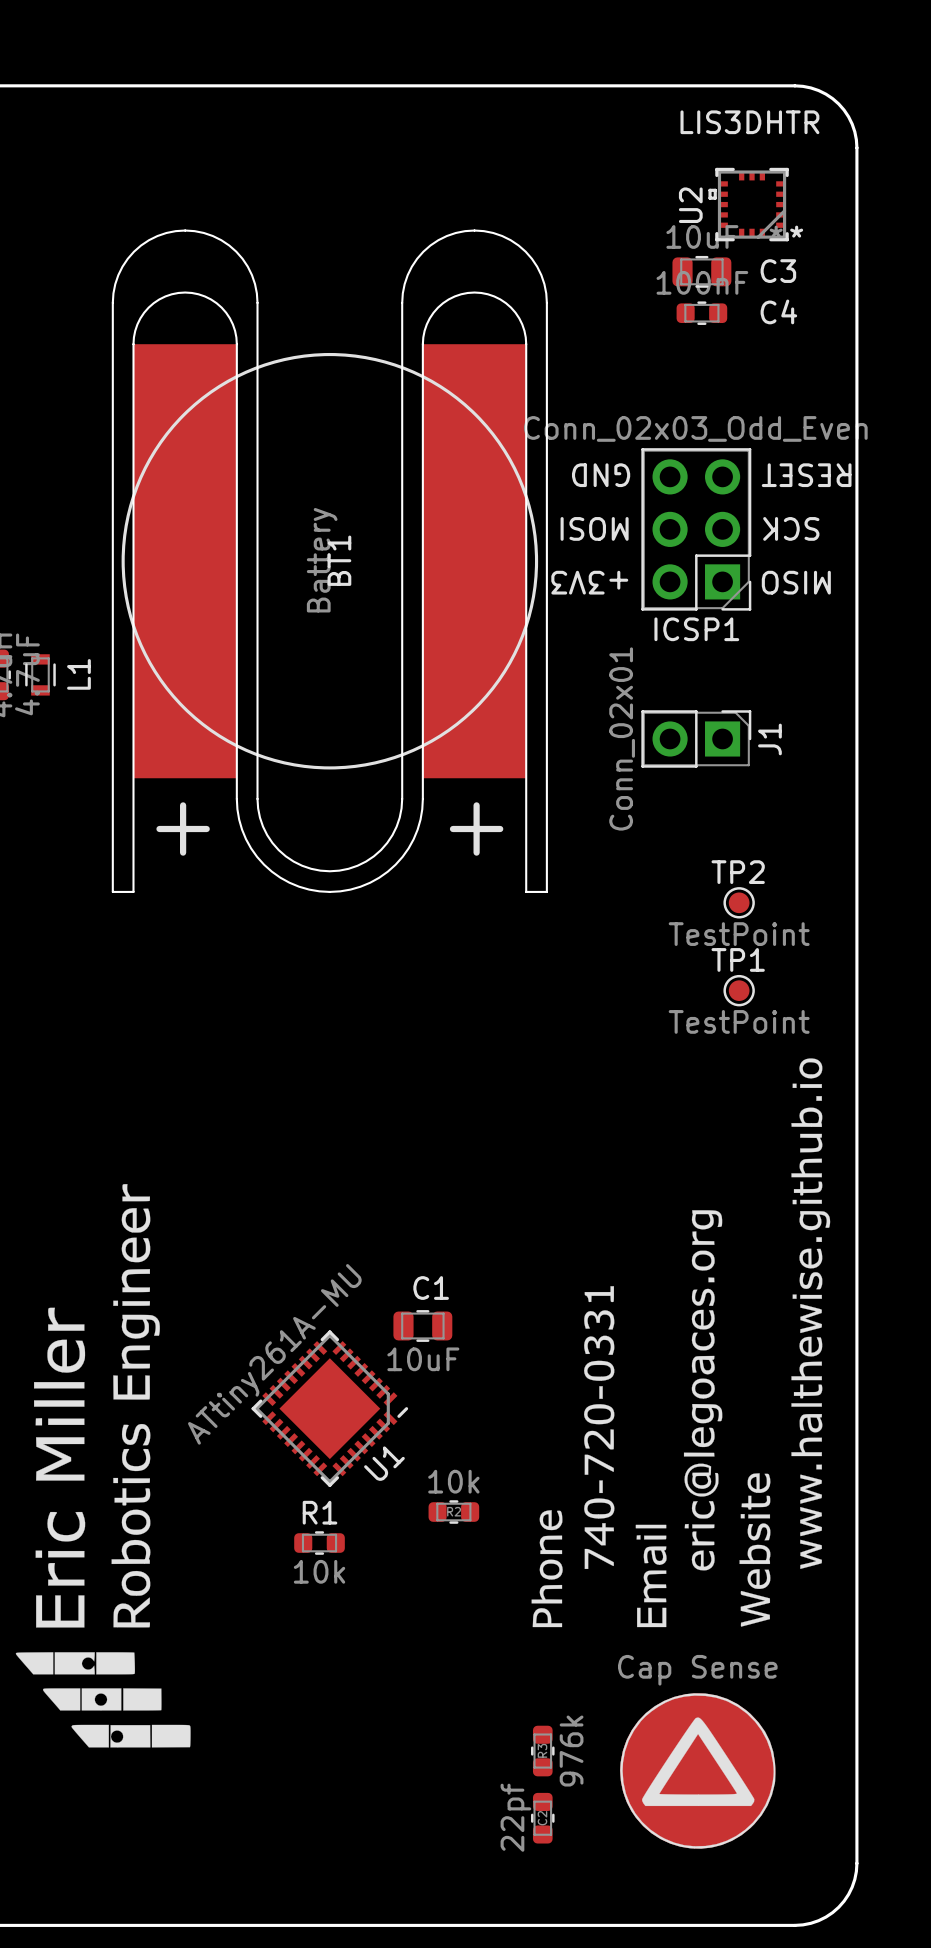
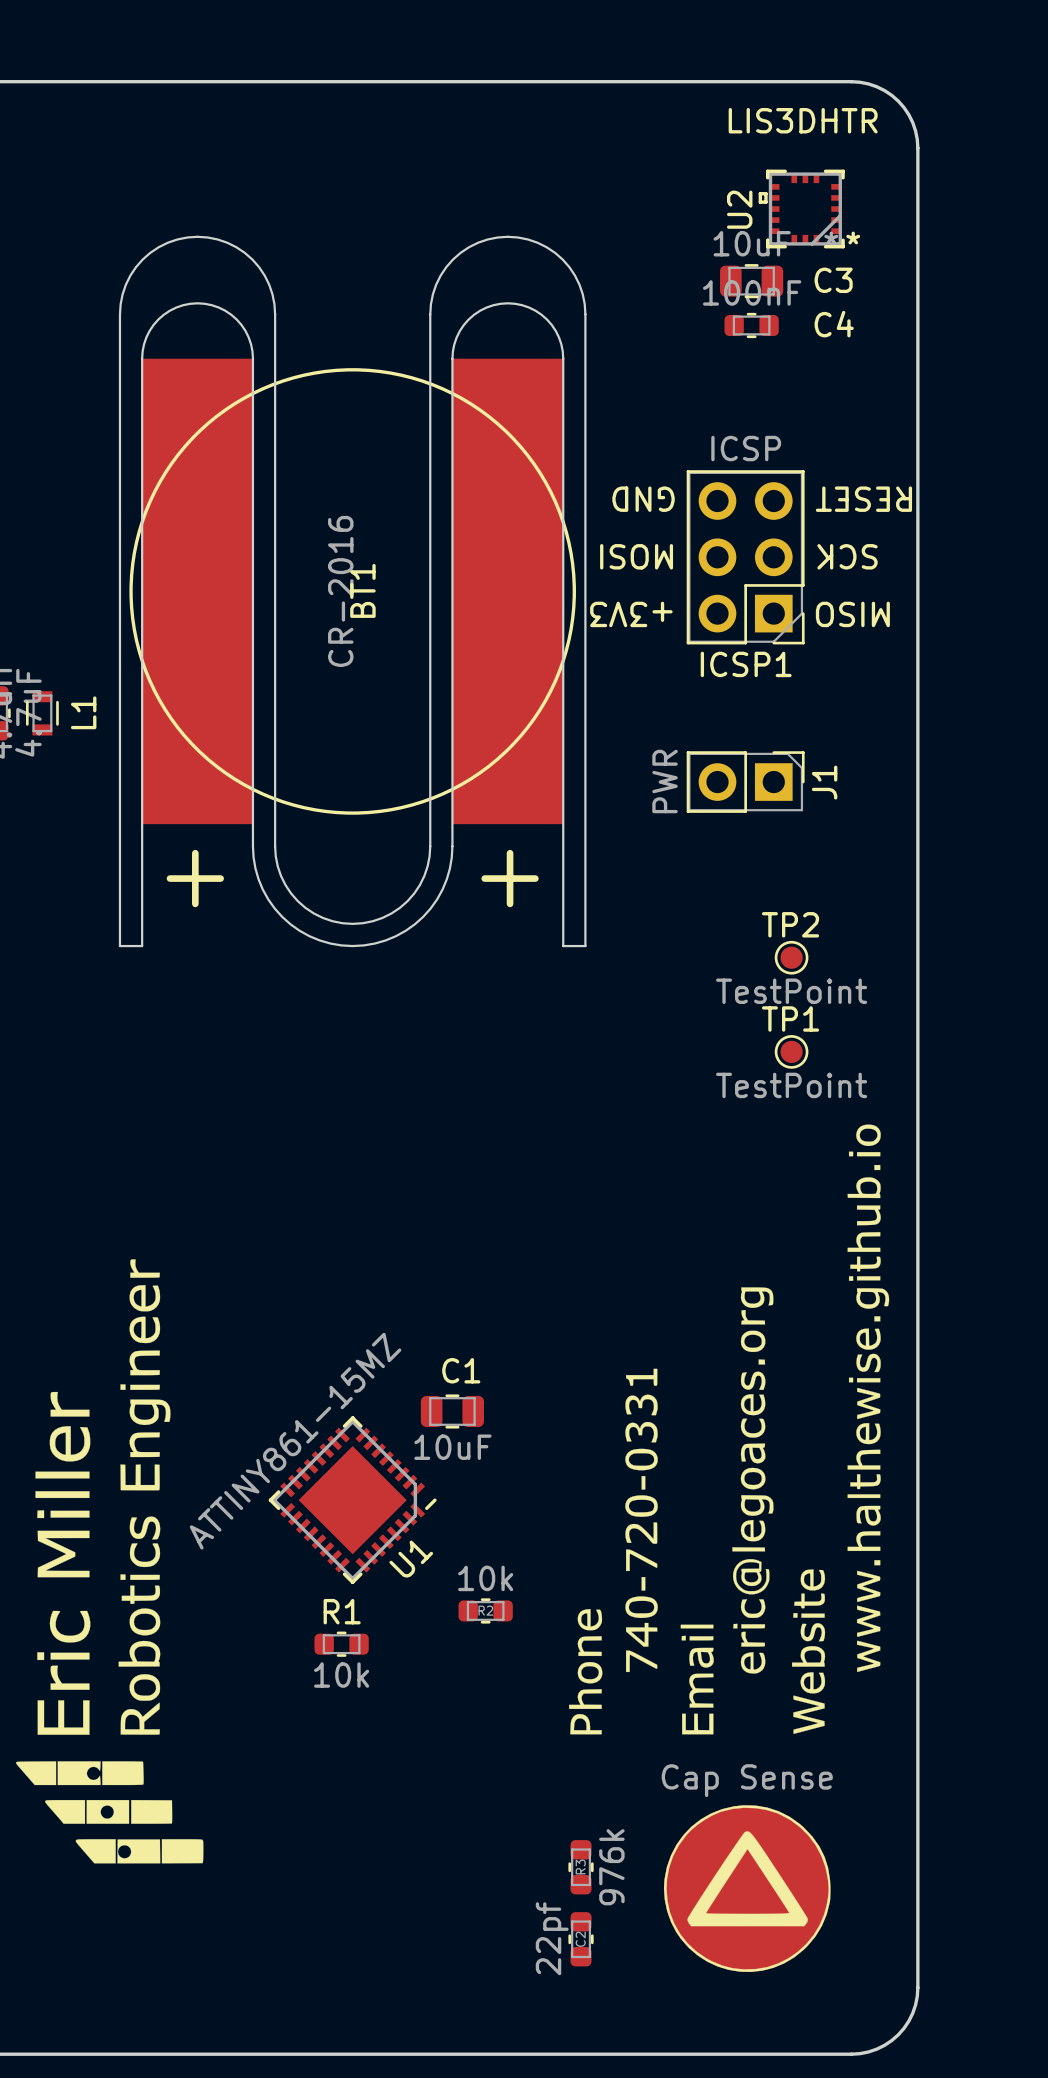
ICSP1 value: Conn_02x03_Odd_Even (695, 428) -> ICSP (746, 448)
BT1 value: Battery (322, 560) -> CR-2016 (340, 591)
J1 value: Conn_02x01 (622, 738) -> PWR (665, 781)
U1 value: ATtiny261A-MU (274, 1354) -> ATTINY861-15MZ (295, 1441)

